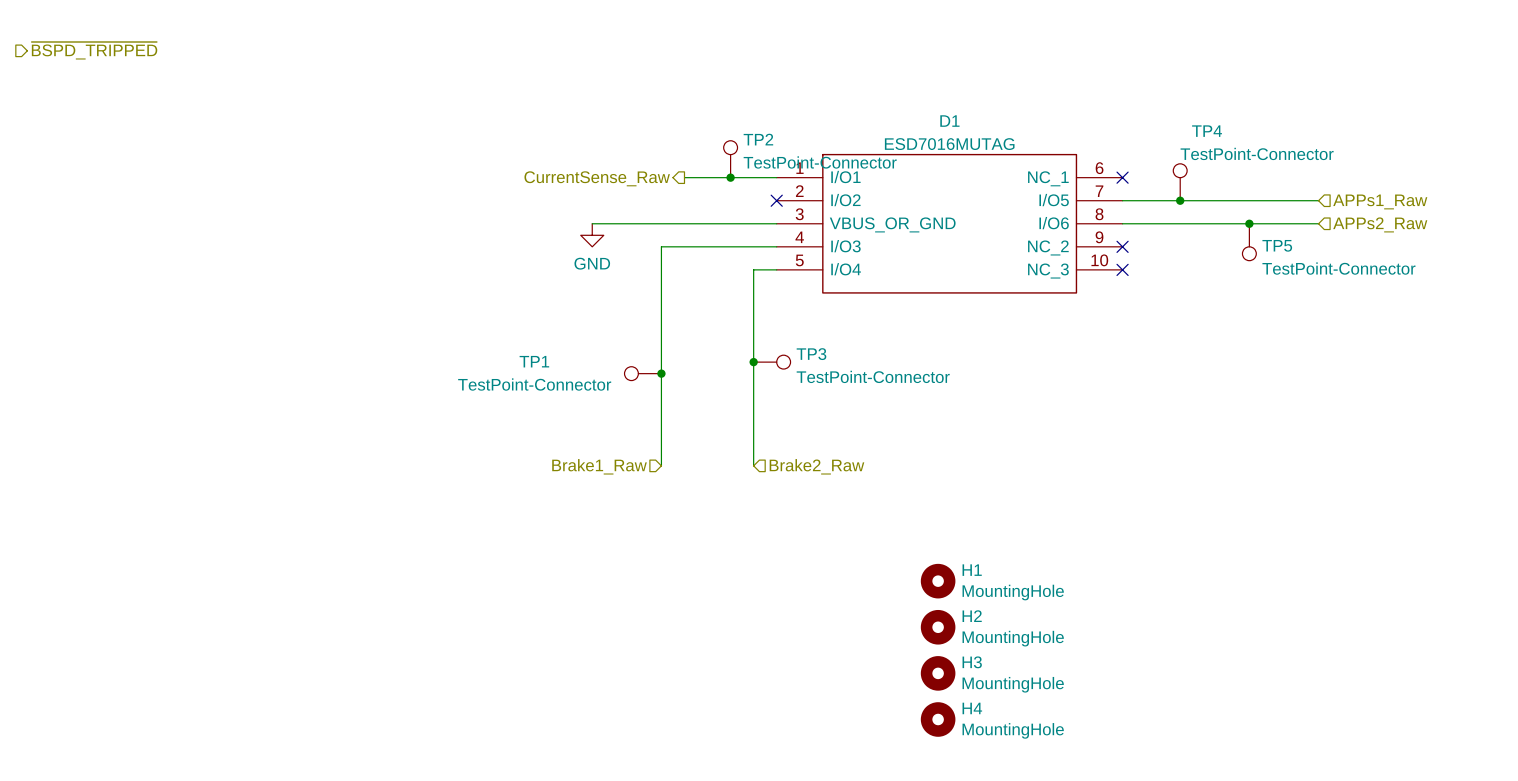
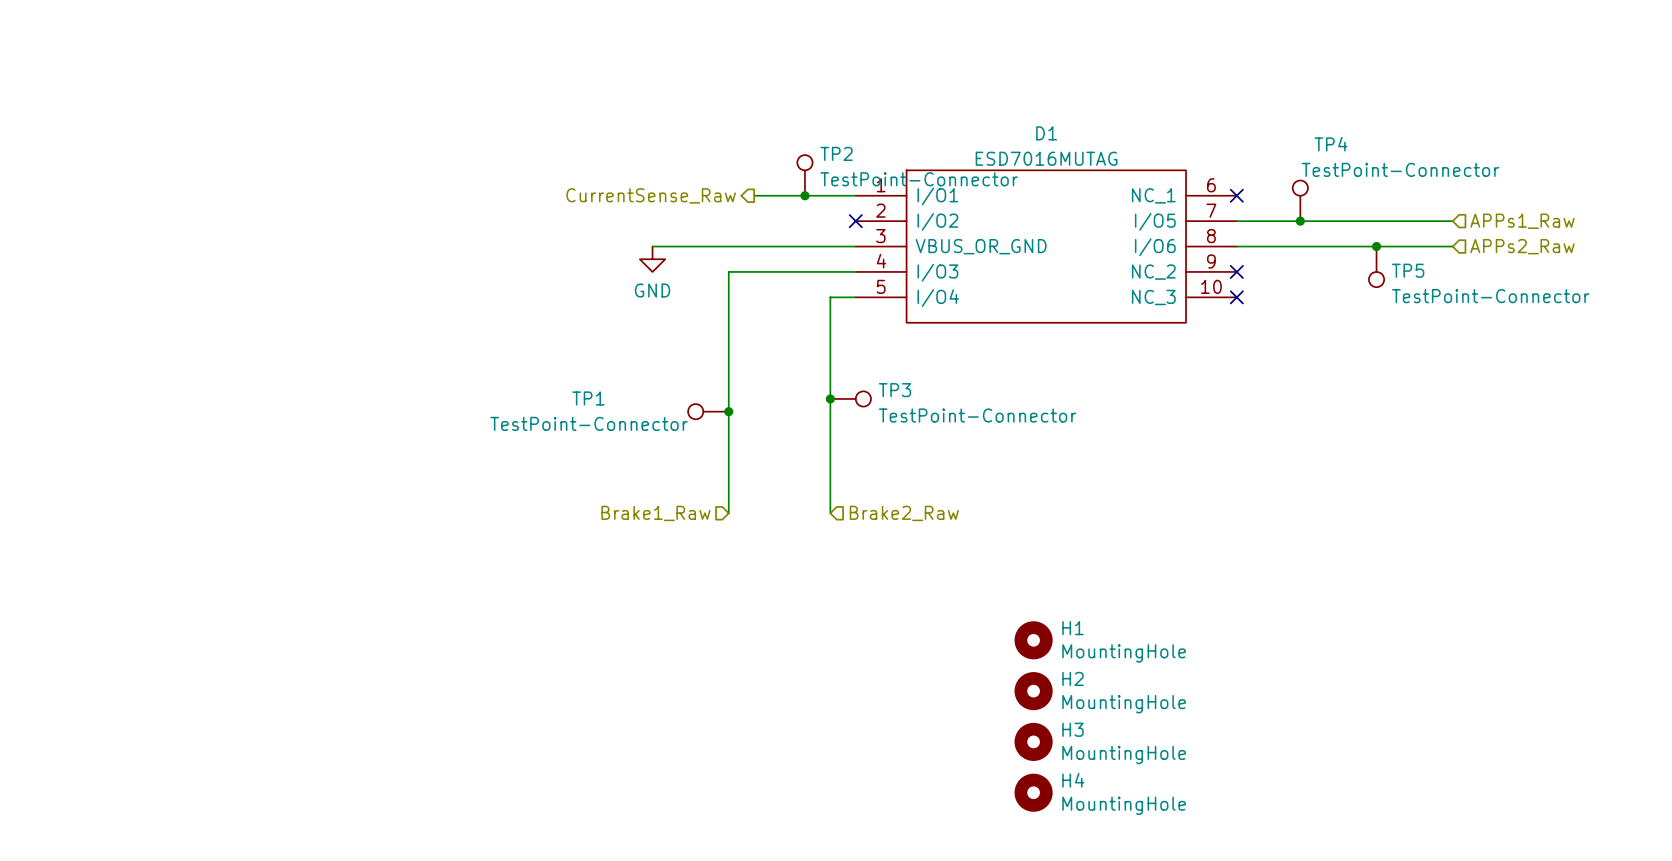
hierarchical label: ~{BSPD_TRIPPED} (94, 50) -> none

